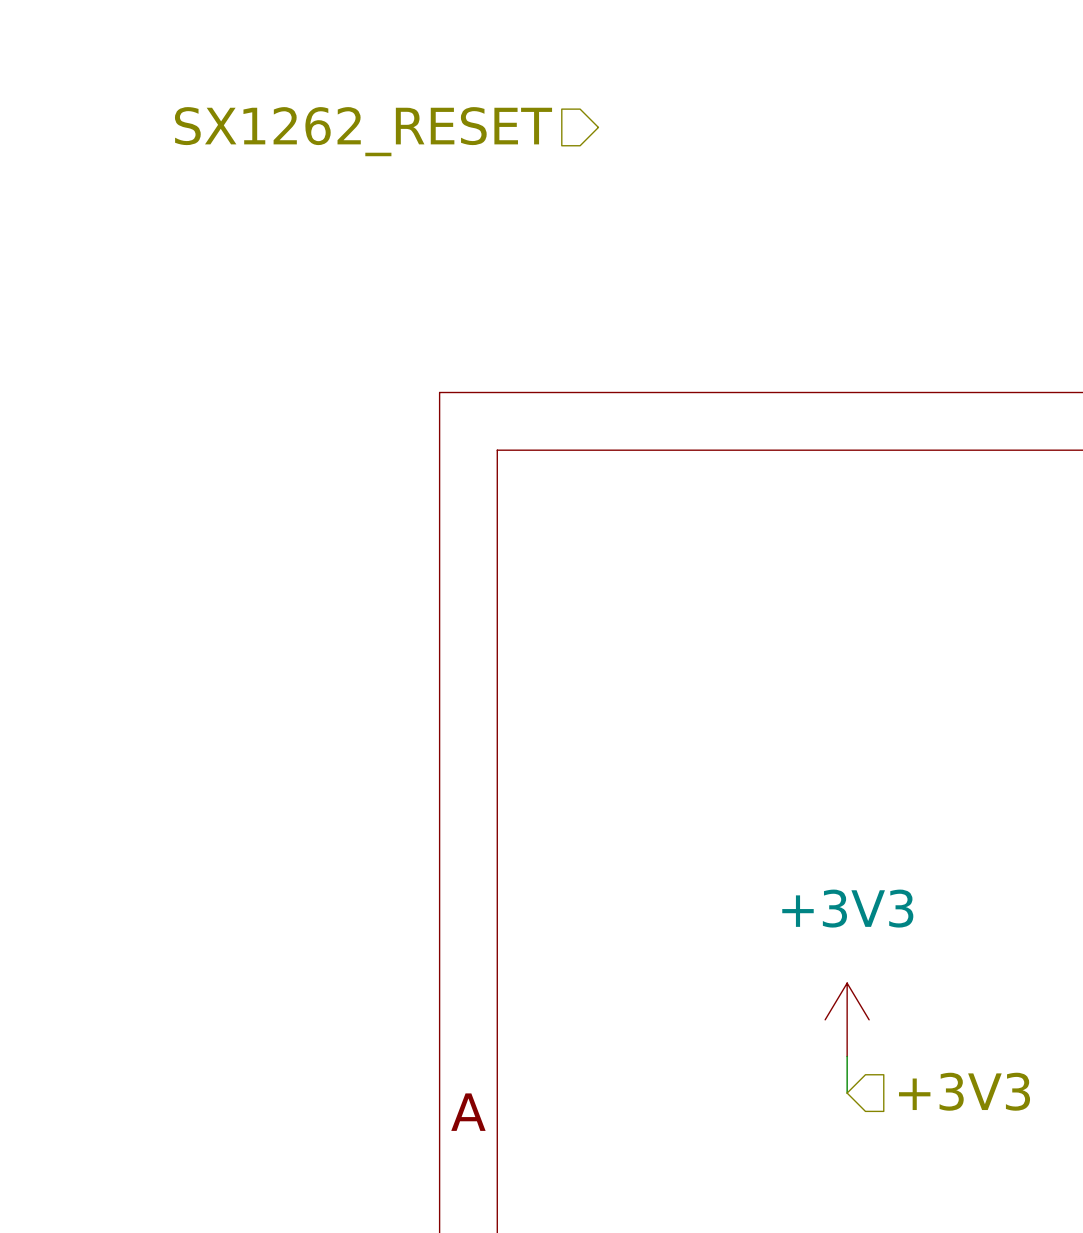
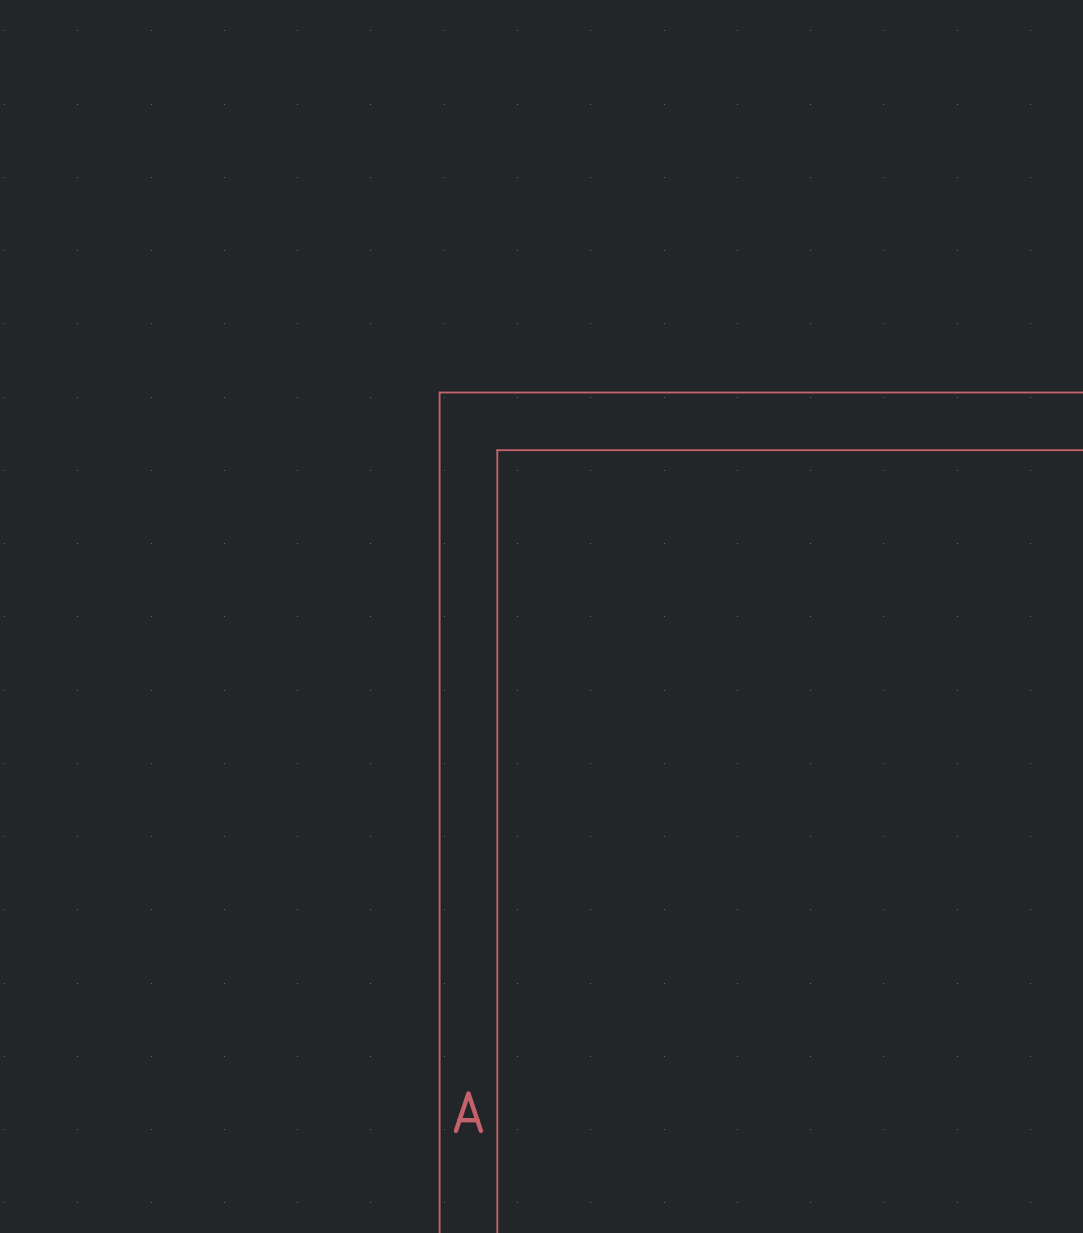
hierarchical label: SX1262_RESET (363, 131) -> none
power symbol: +3V3 (847, 1019) -> none
wire: (847, 1056) (847, 1093) -> none
hierarchical label: +3V3 (964, 1091) -> none

